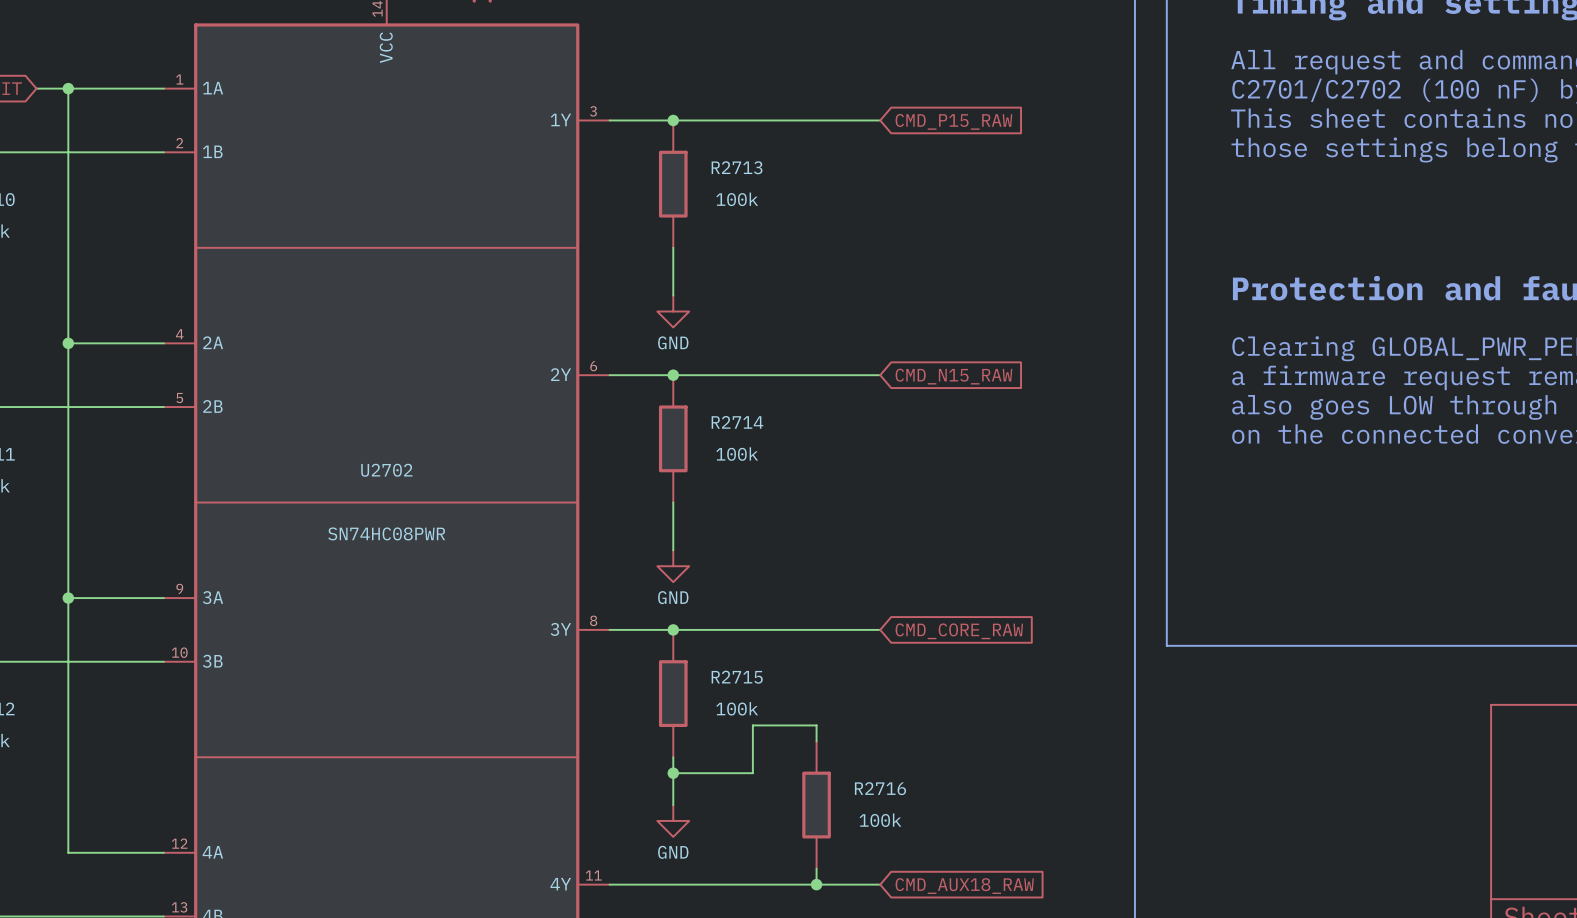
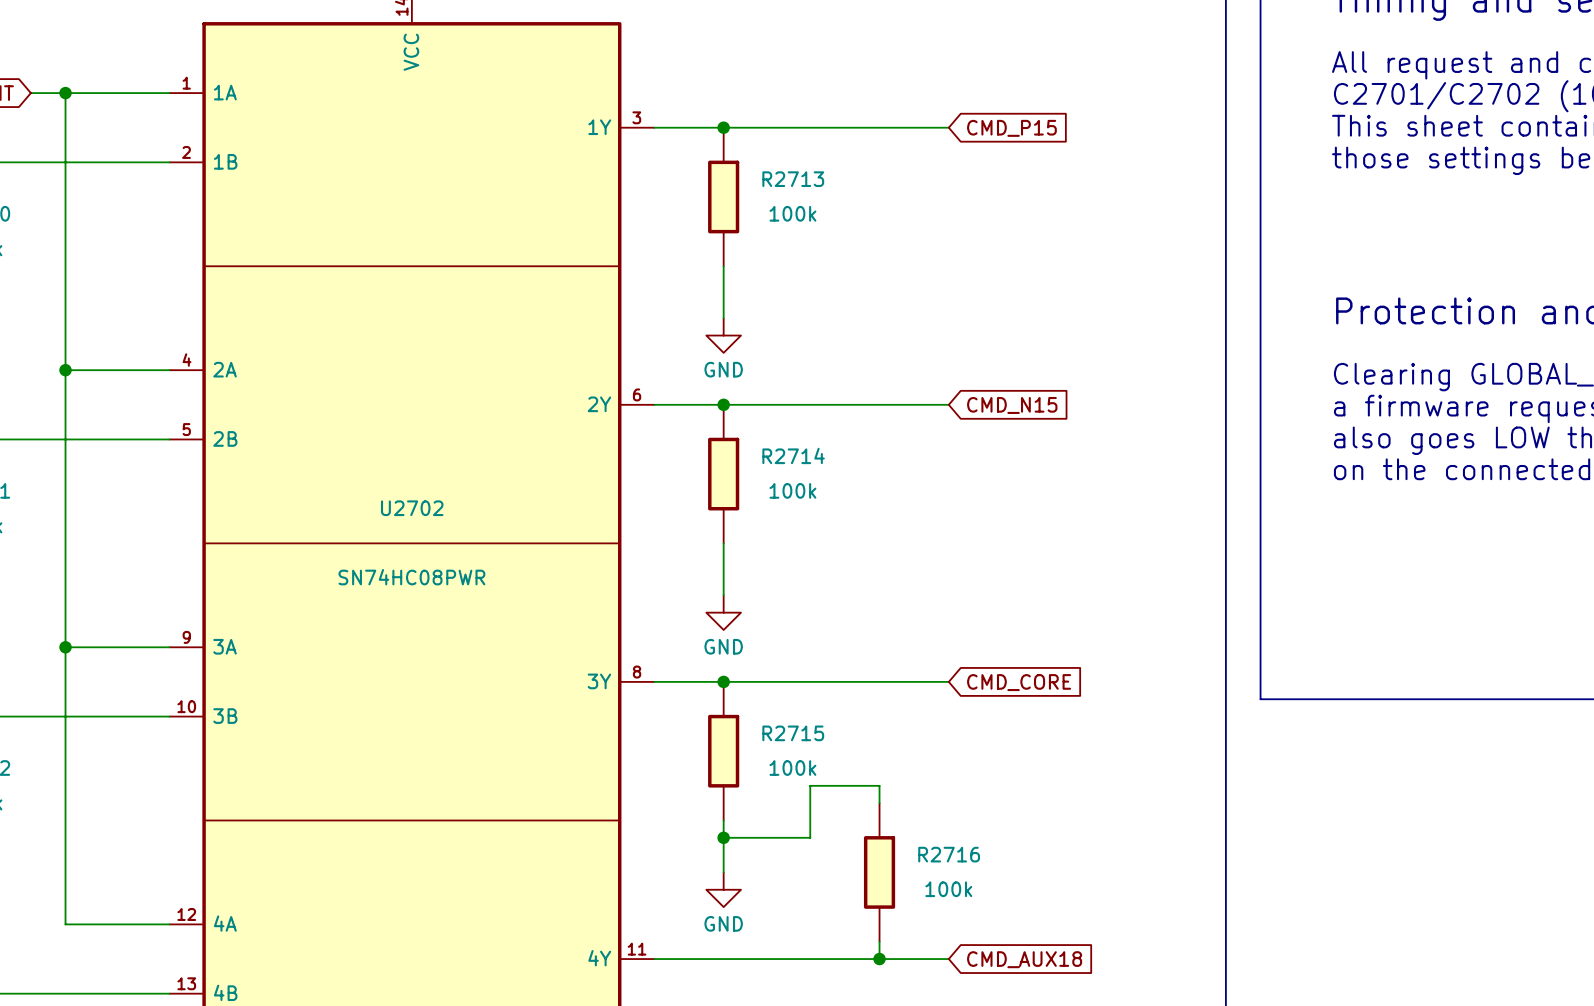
global label: CMD_P15_RAW (953, 121) -> CMD_P15 (1011, 128)
global label: CMD_N15_RAW (953, 376) -> CMD_N15 (1012, 405)
global label: CMD_CORE_RAW (959, 631) -> CMD_CORE (1019, 682)
global label: CMD_AUX18_RAW (964, 886) -> CMD_AUX18 (1024, 959)

